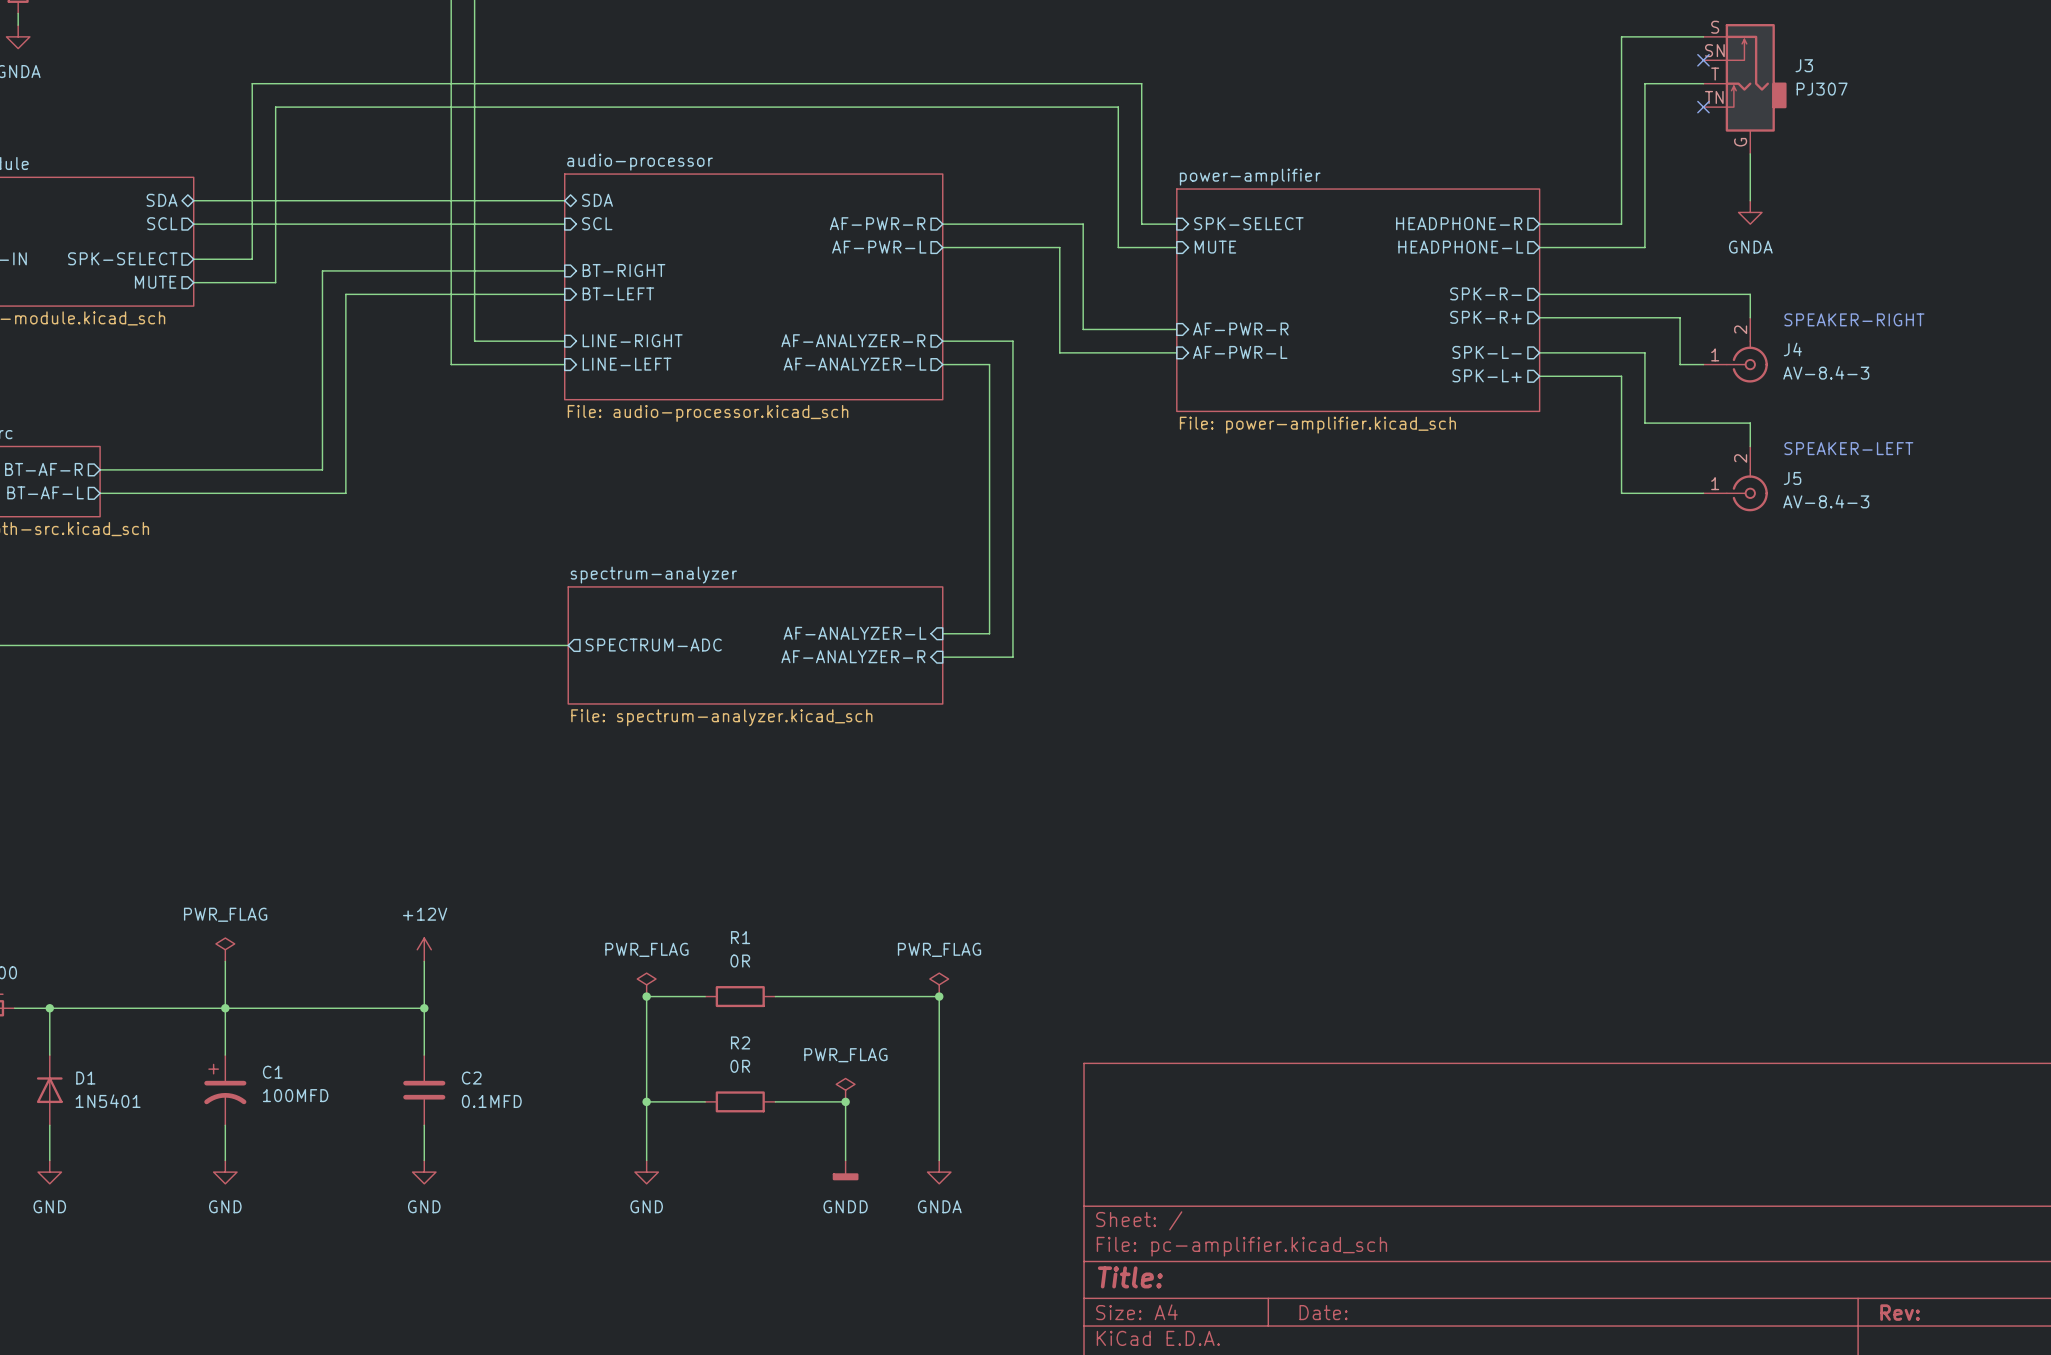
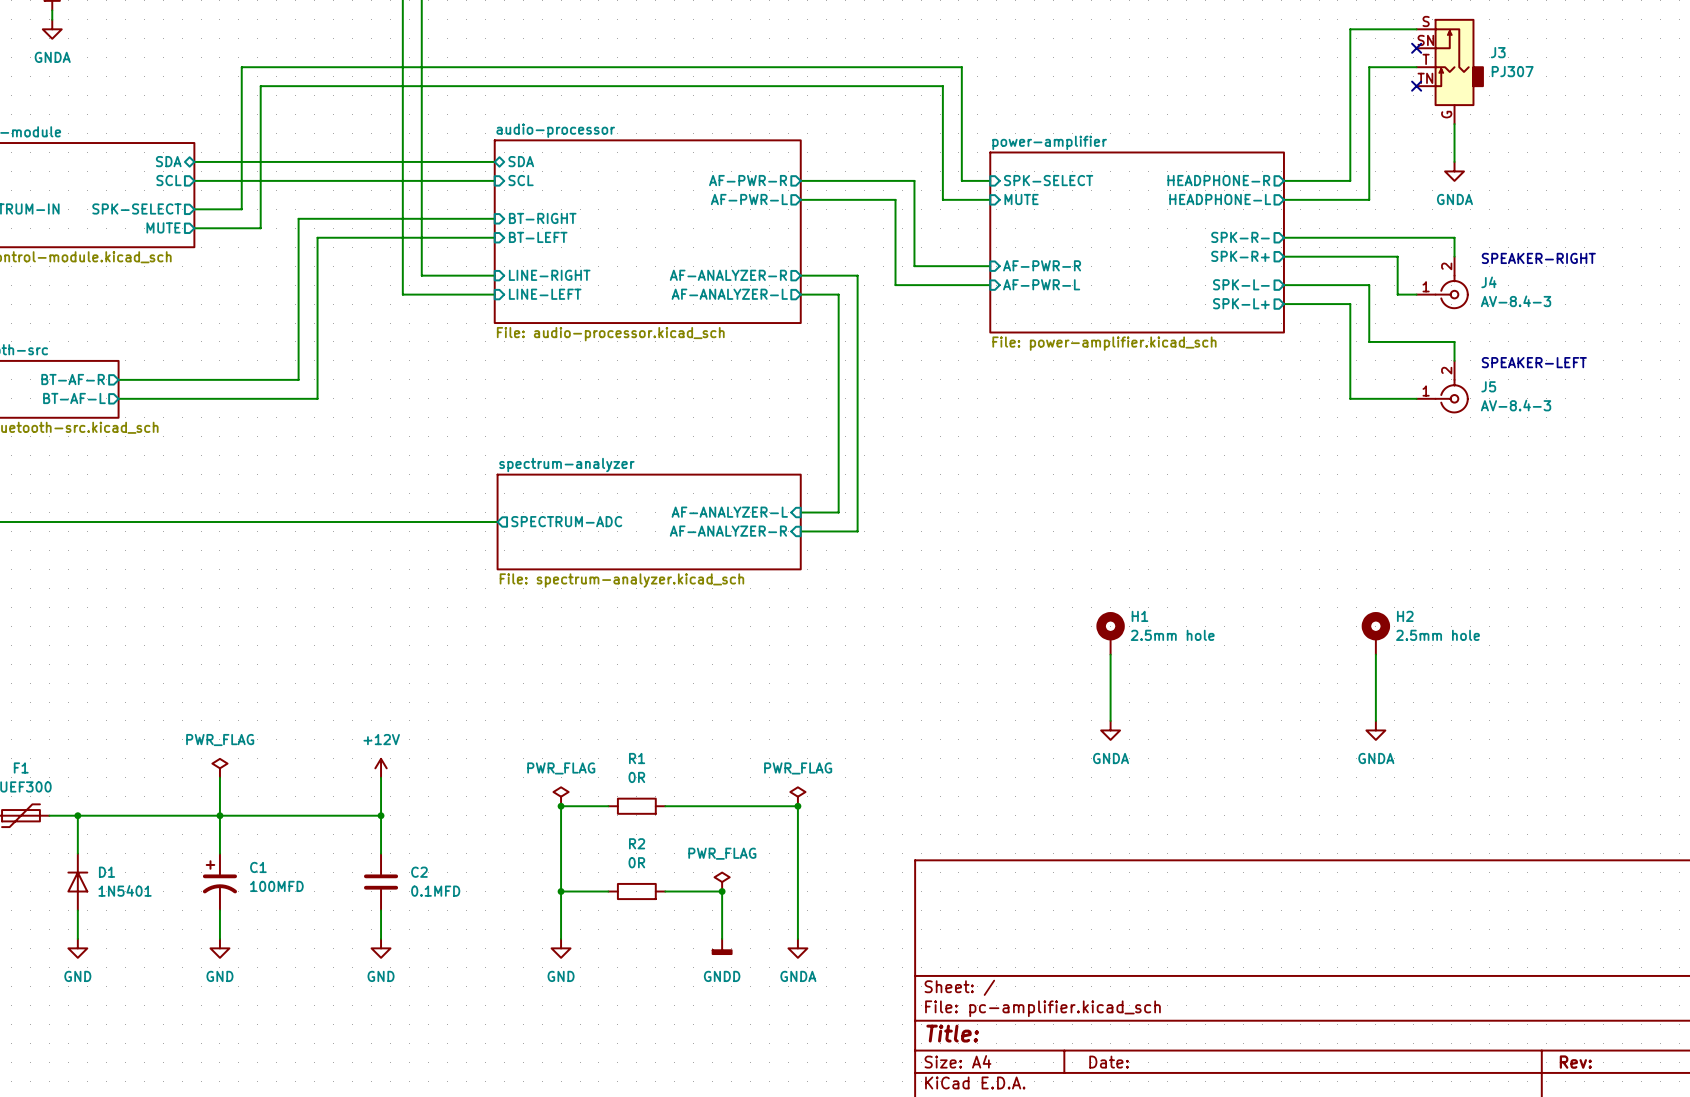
H1: none -> 2.5mm hole (1110, 633)
H2: none -> 2.5mm hole (1375, 633)
wire: none -> (1110, 654) (1110, 720)
wire: none -> (1375, 654) (1375, 720)
power symbol: none -> GNDA (1110, 730)
power symbol: none -> GNDA (1375, 730)

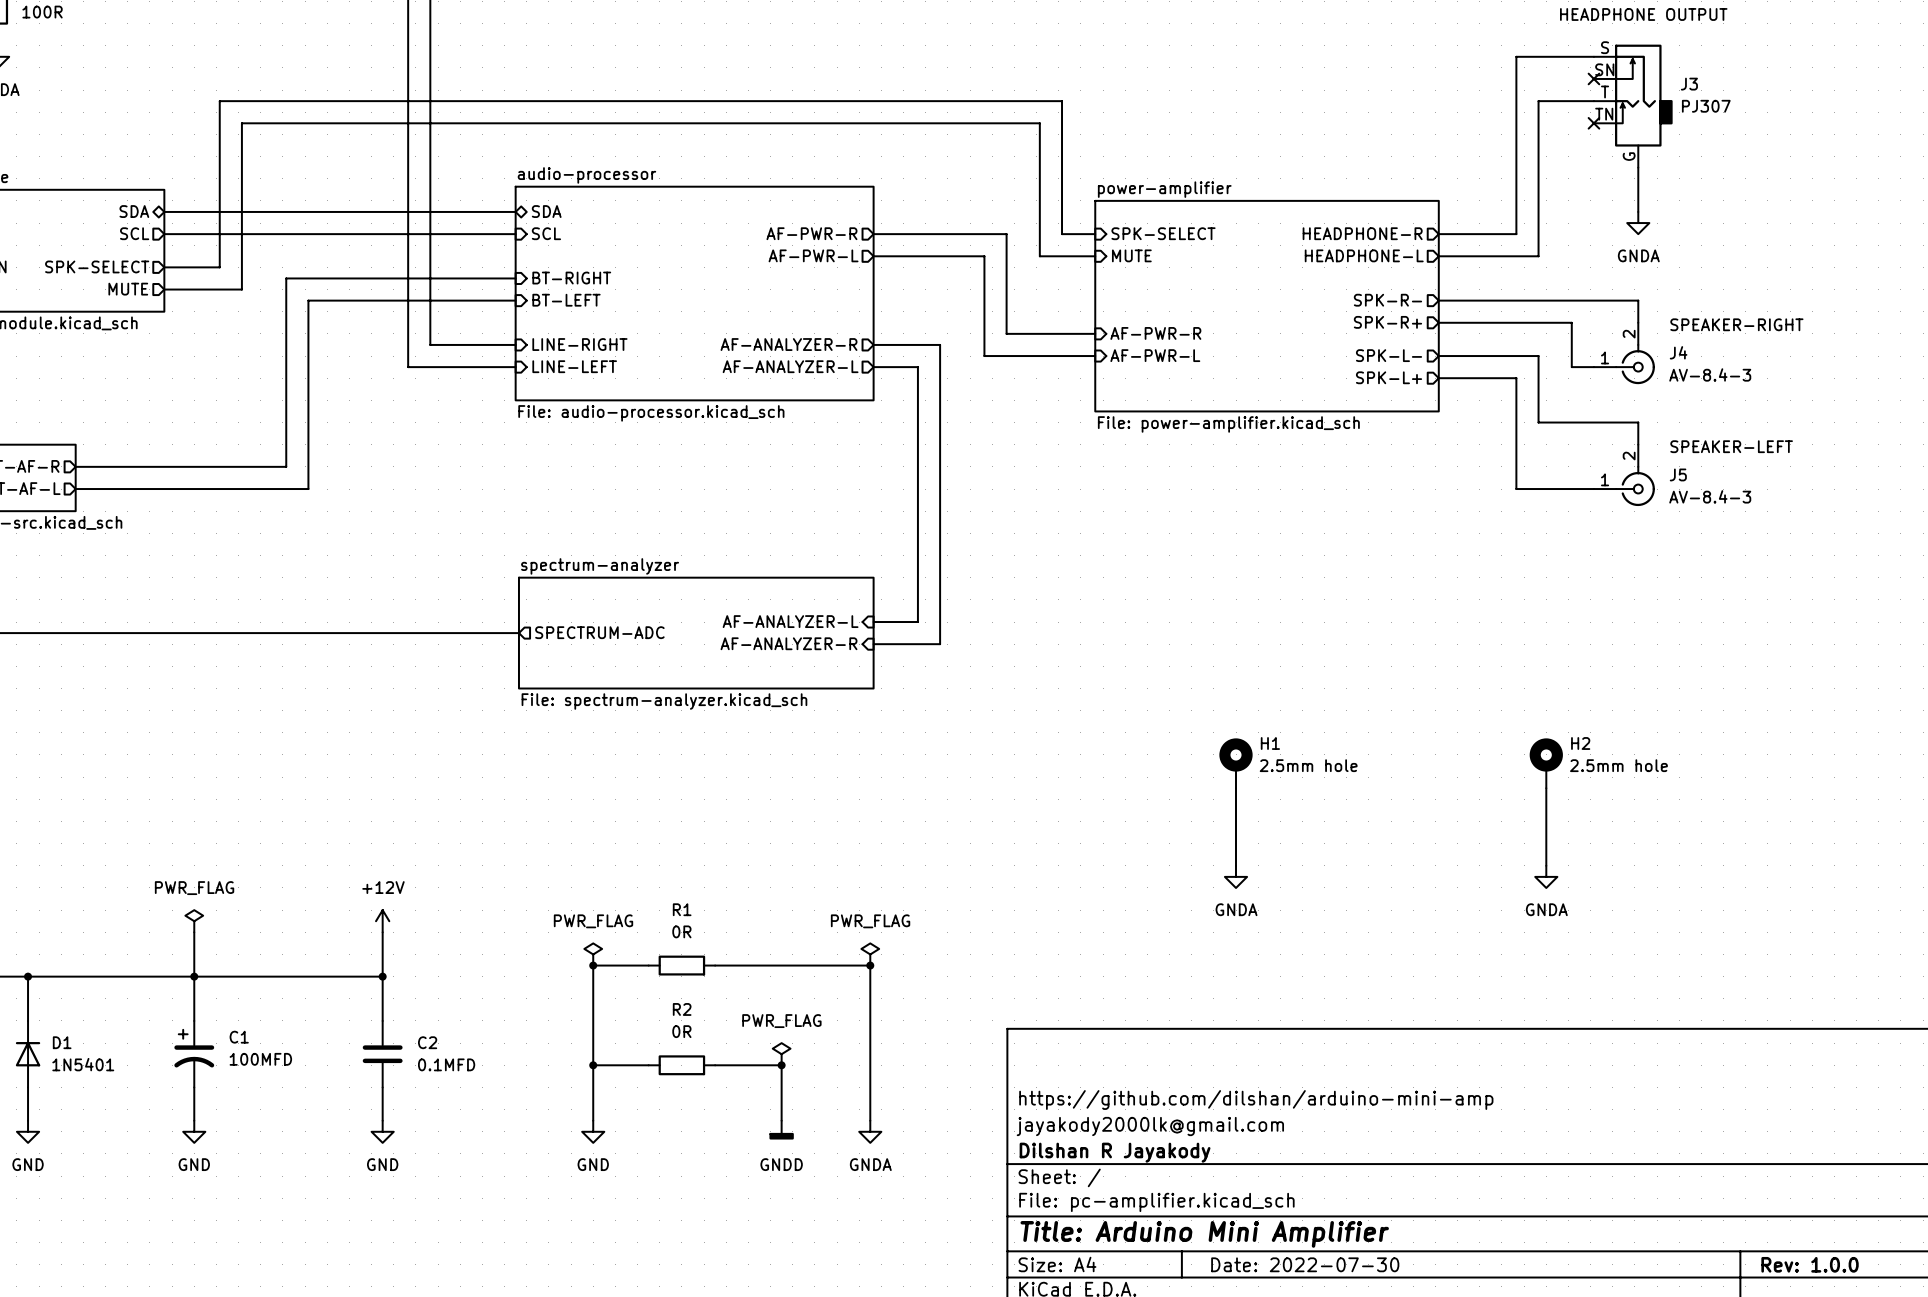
title block: none -> https://github.com/dilshan/arduino-mini-amp (1256, 1100)
title block: none -> jayakody2000lk@gmail.com (1150, 1126)
title block: none -> Dilshan R Jayakody (1115, 1152)
title block: Title: (952, 1033) -> Title: Arduino Mini Amplifier (1204, 1234)
title block: Date: (1109, 1062) -> Date: 2022-07-30 (1305, 1264)
title block: Rev: (1575, 1062) -> Rev: 1.0.0 (1810, 1264)

